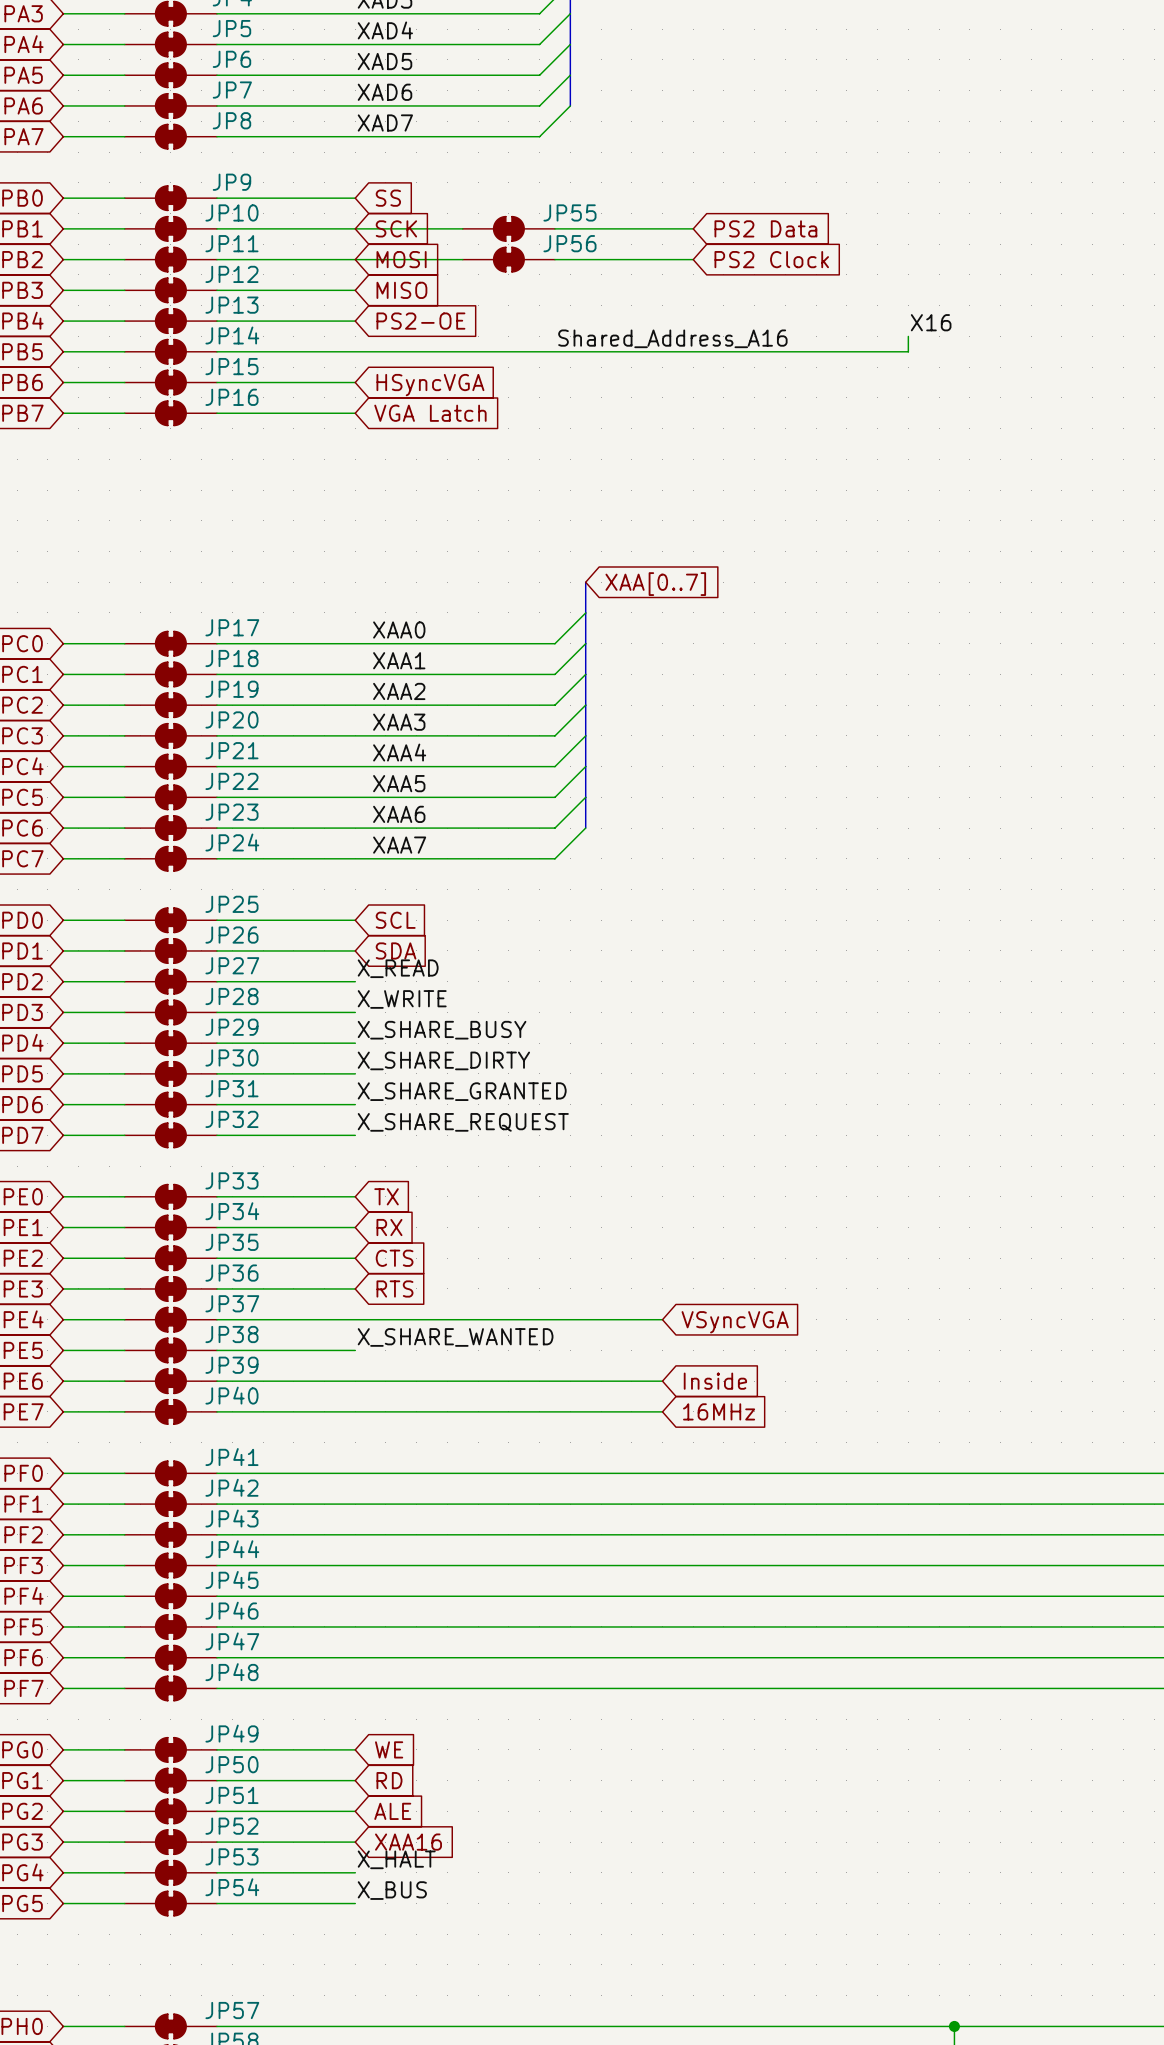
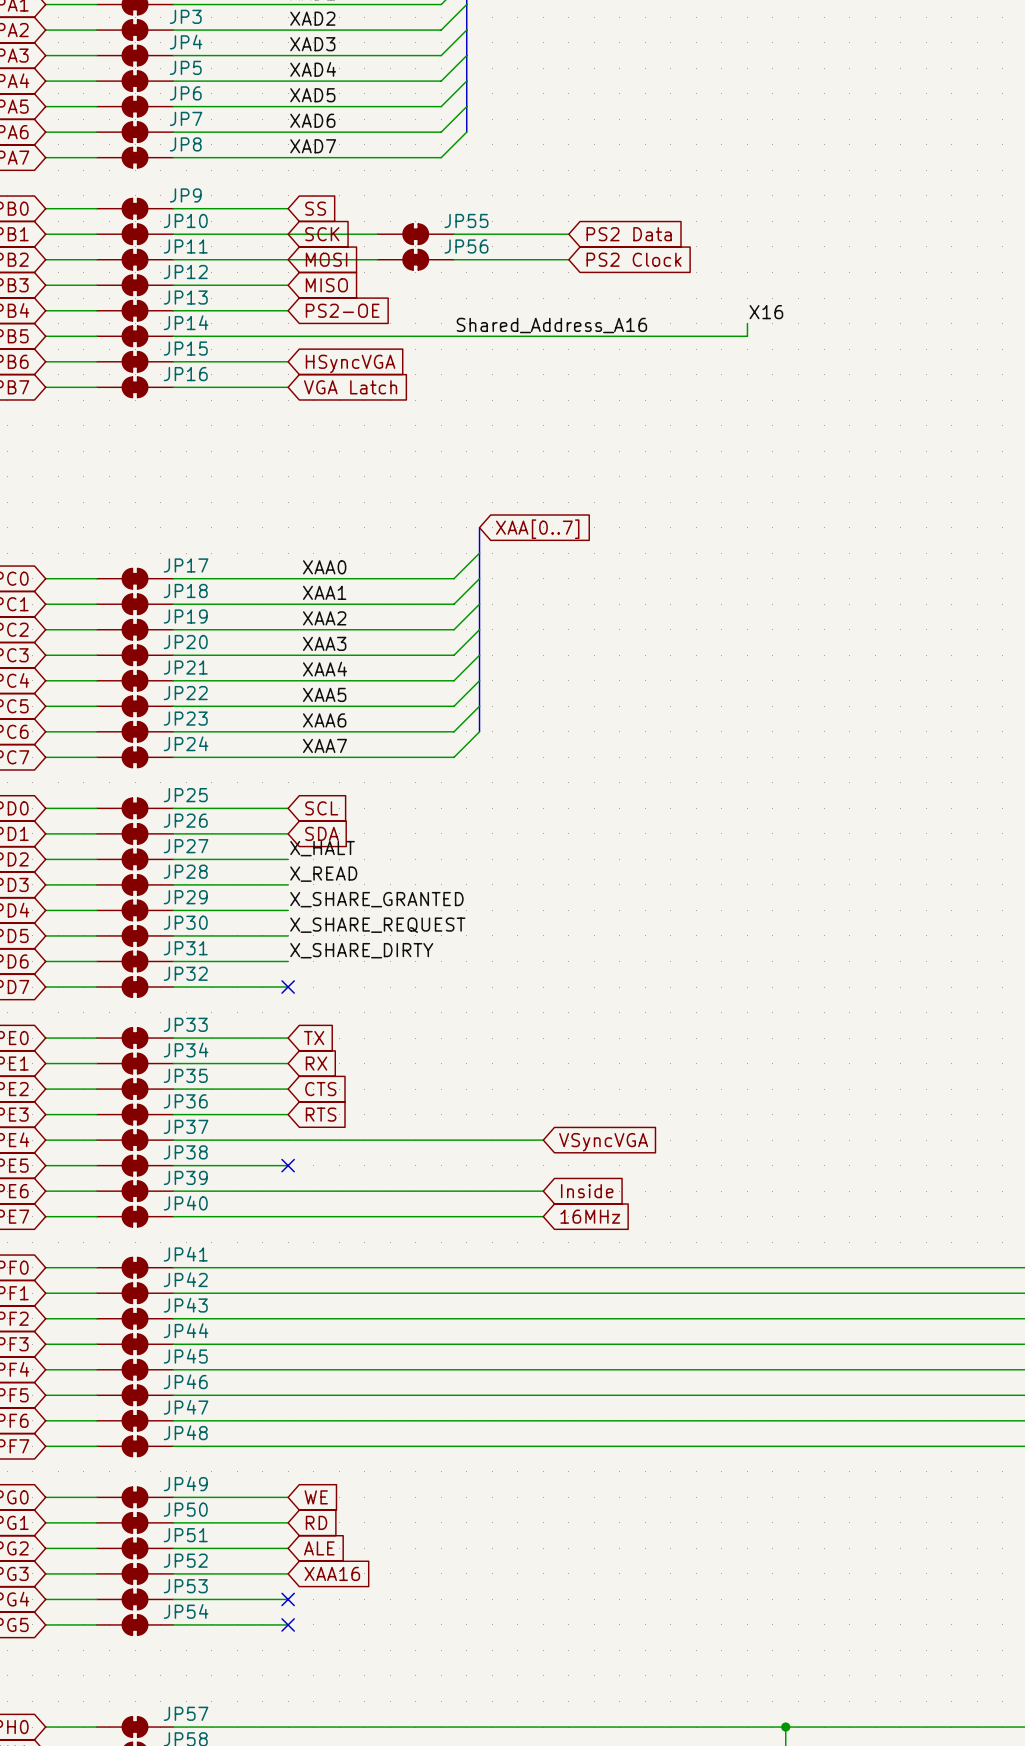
label: X_READ (398, 968) -> X_HALT (322, 848)
label: X_WRITE (402, 999) -> X_READ (323, 874)
label: X_SHARE_BUSY (442, 1030) -> X_SHARE_GRANTED (376, 899)
label: X_SHARE_DIRTY (443, 1060) -> X_SHARE_REQUEST (377, 925)
label: X_SHARE_GRANTED (462, 1091) -> X_SHARE_DIRTY (361, 950)
label: X_SHARE_REQUEST (463, 1122) -> none
no-connect mark: none -> (288, 987)
label: X_SHARE_WANTED (455, 1337) -> none
no-connect mark: none -> (288, 1165)
label: X_HALT (396, 1859) -> none
no-connect mark: none -> (288, 1599)
label: X_BUS (392, 1890) -> none
no-connect mark: none -> (288, 1624)

